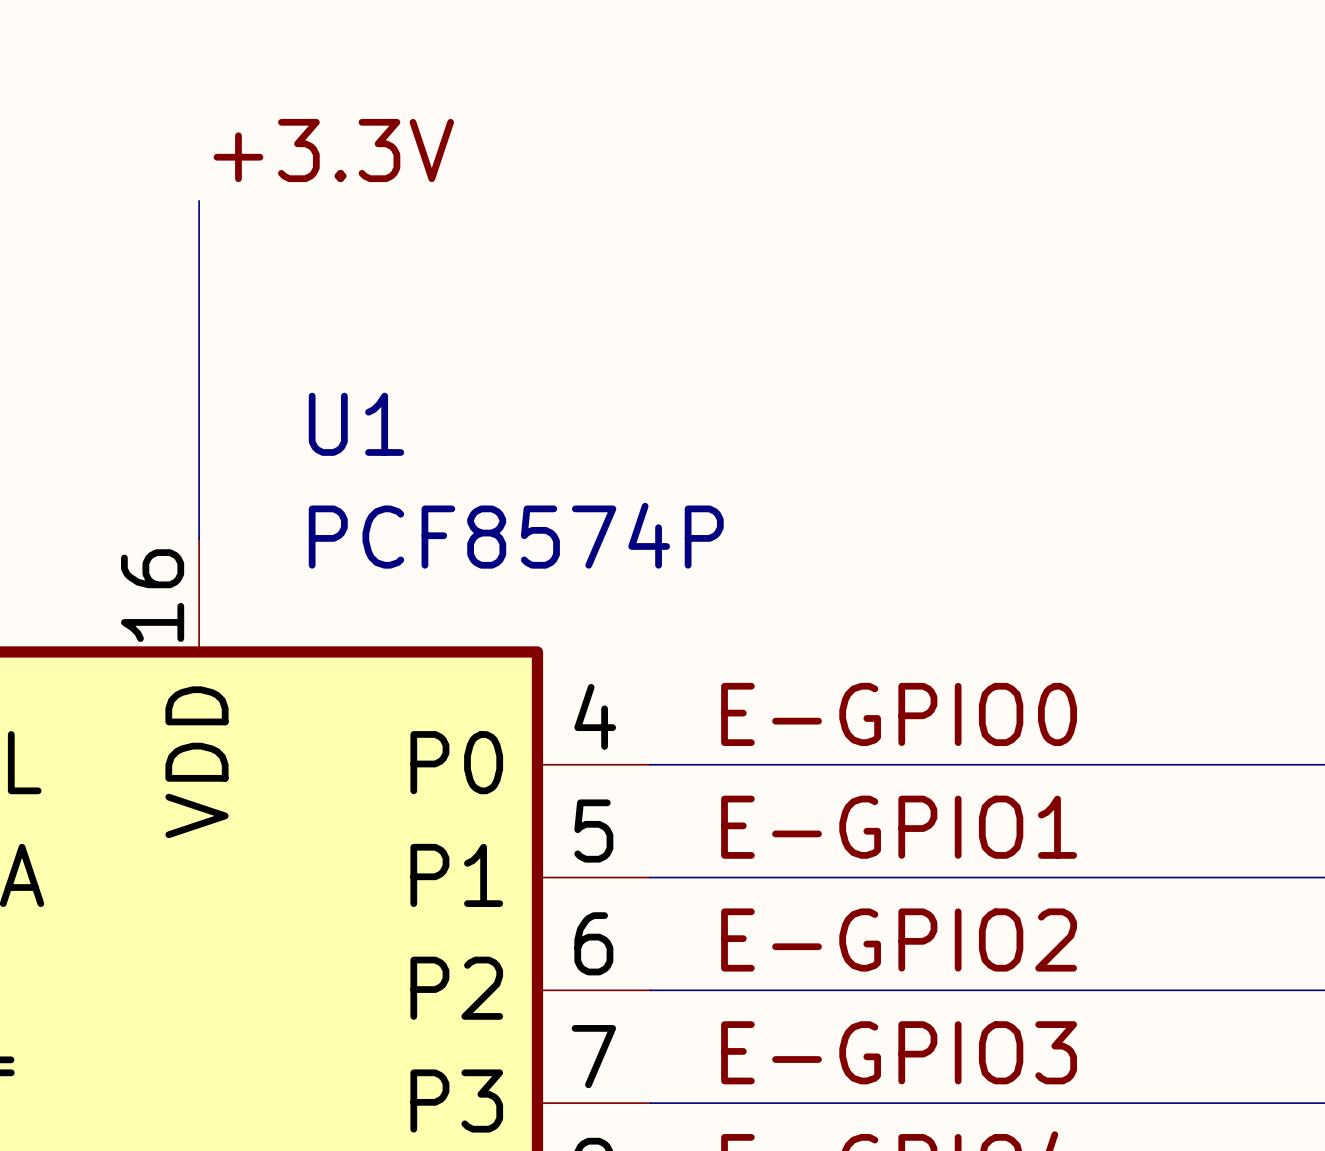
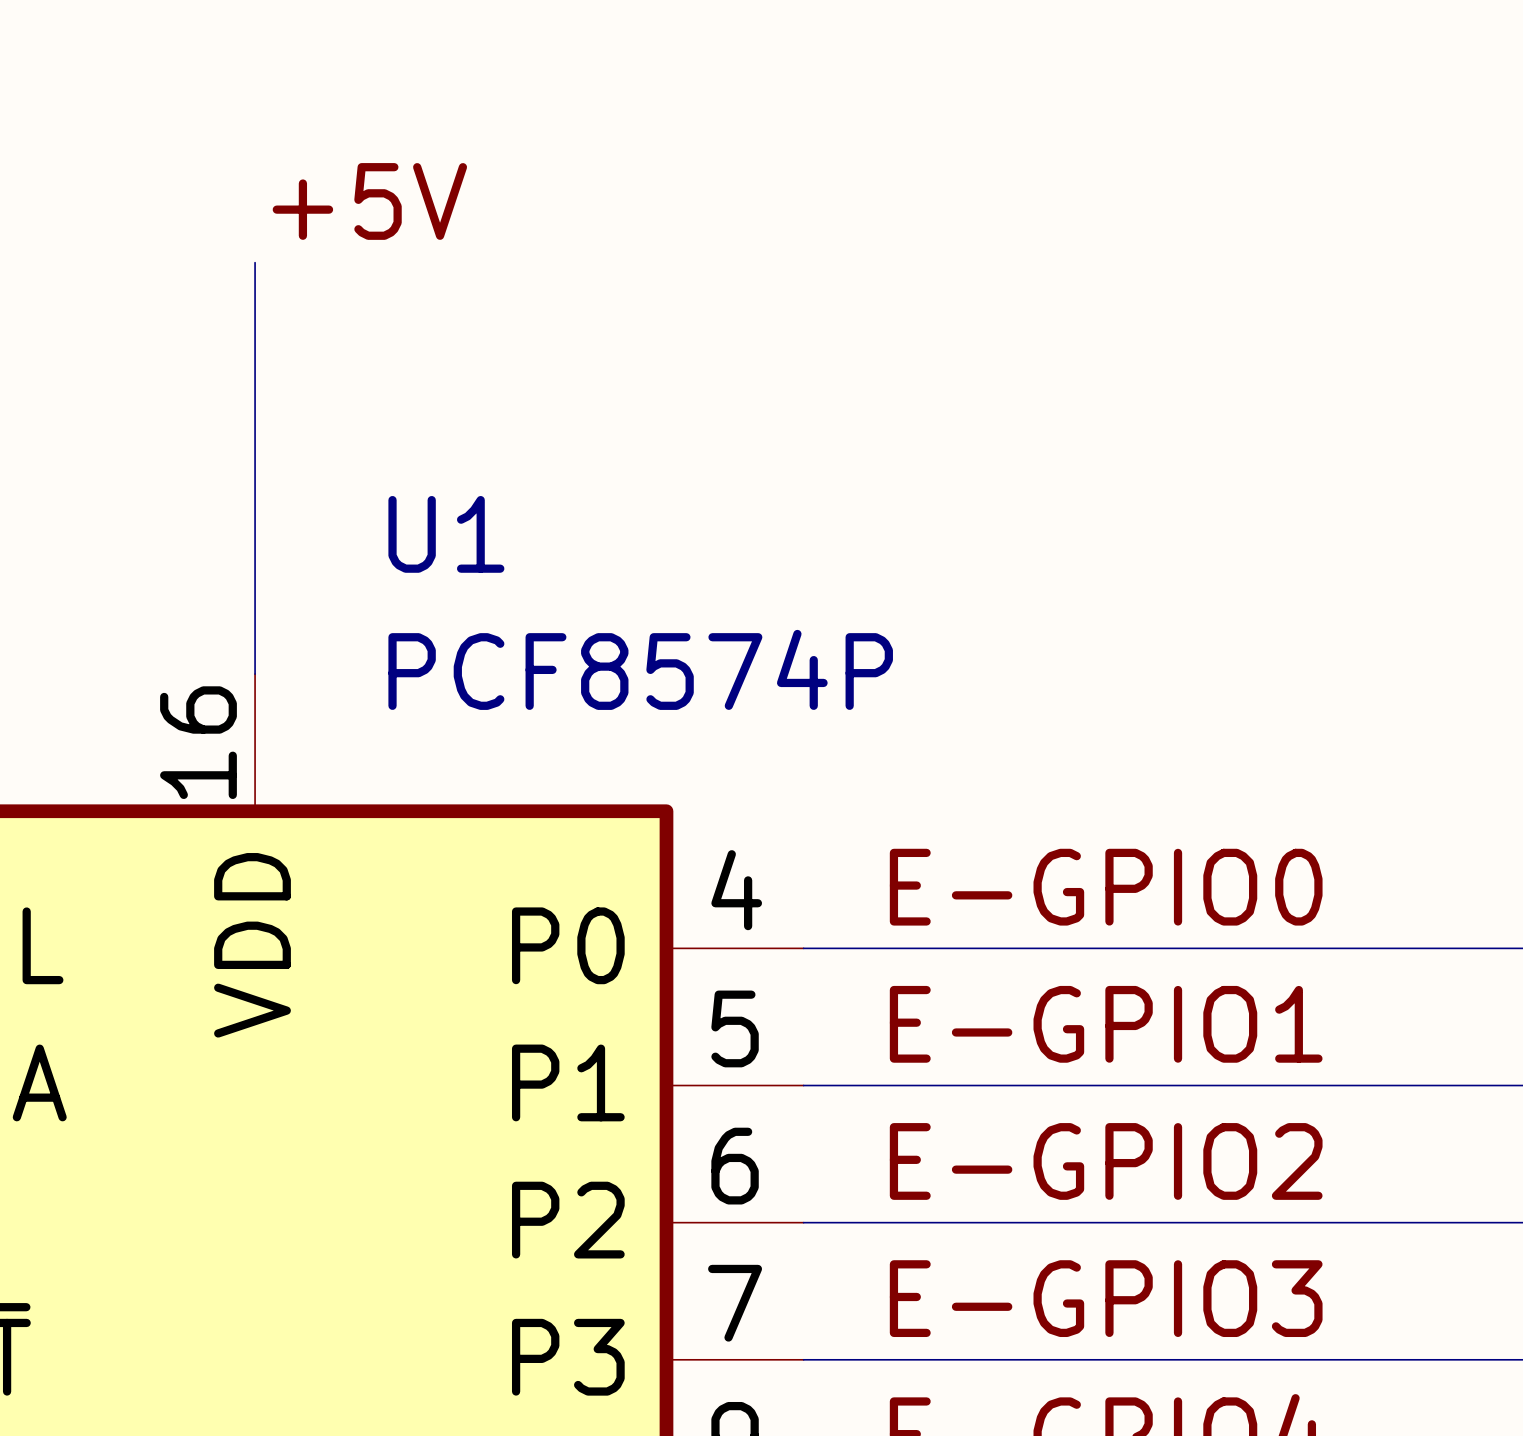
label: +3.3V (333, 150) -> +5V (369, 201)

